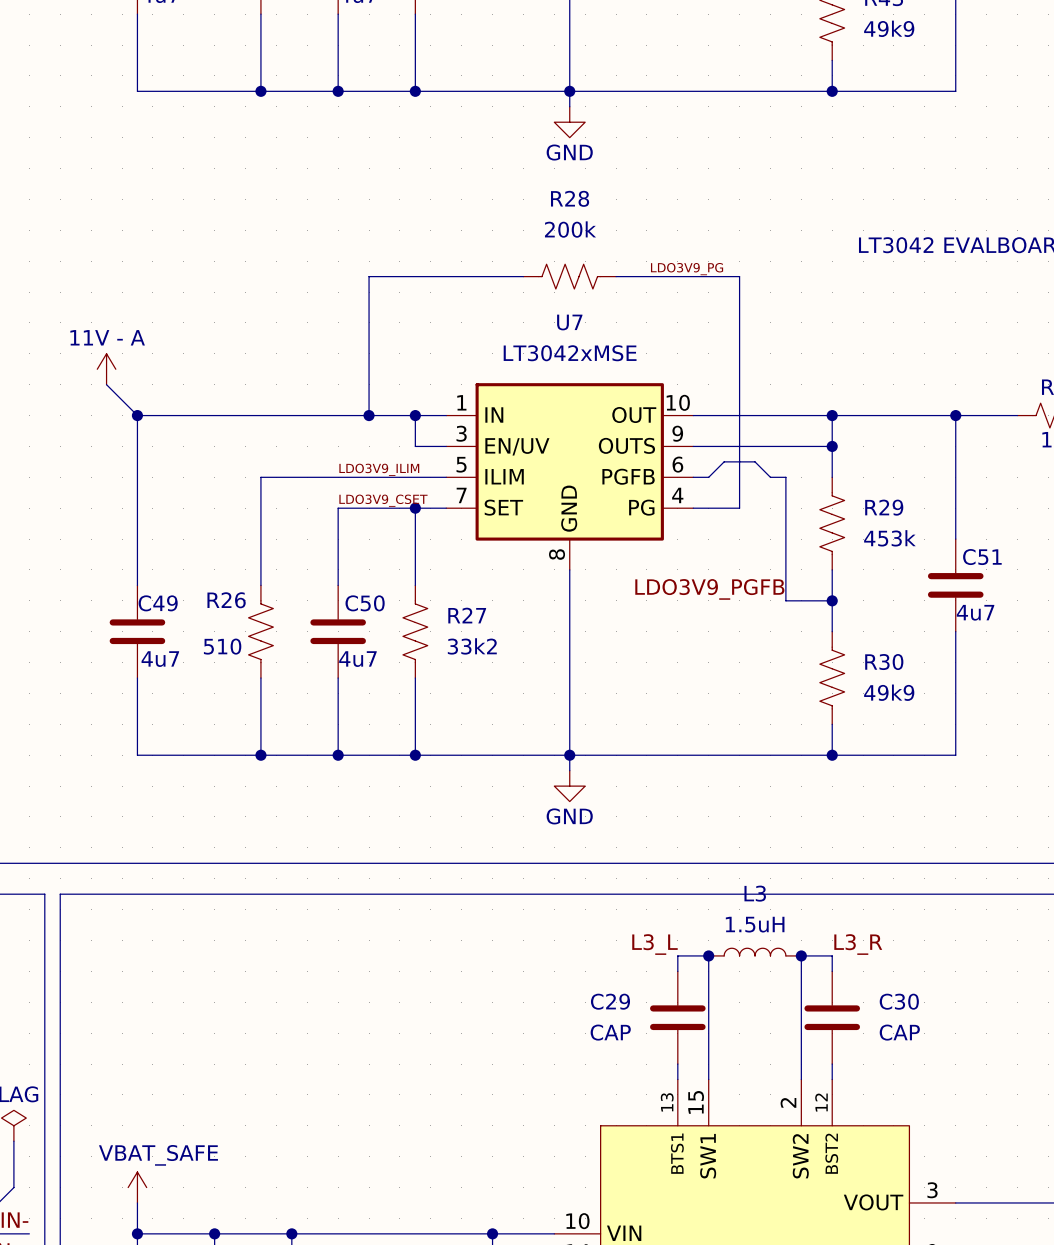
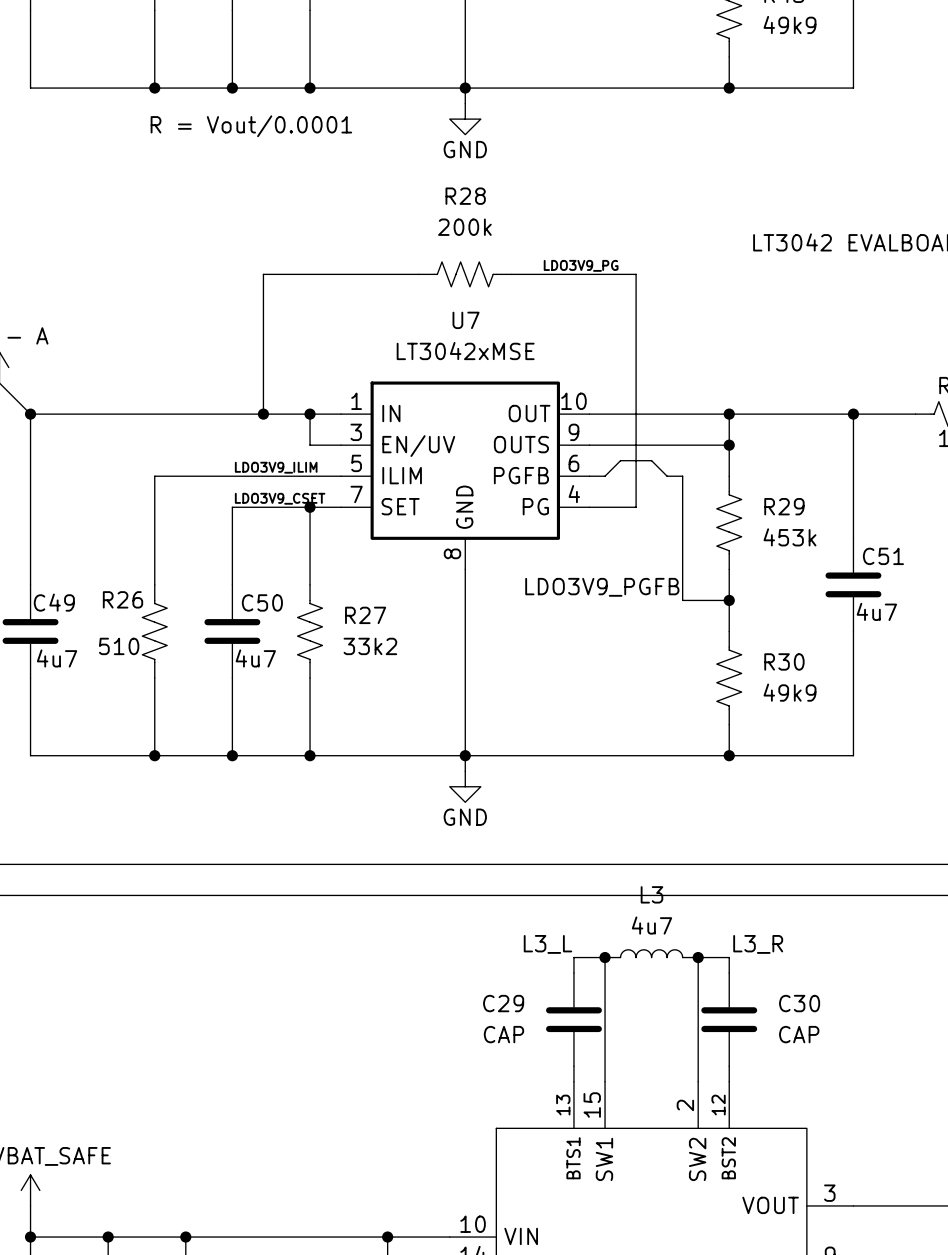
text: none -> R = Vout/0.0001 (251, 126)
L3 value: 1.5uH (755, 924) -> 4u7 (651, 925)

